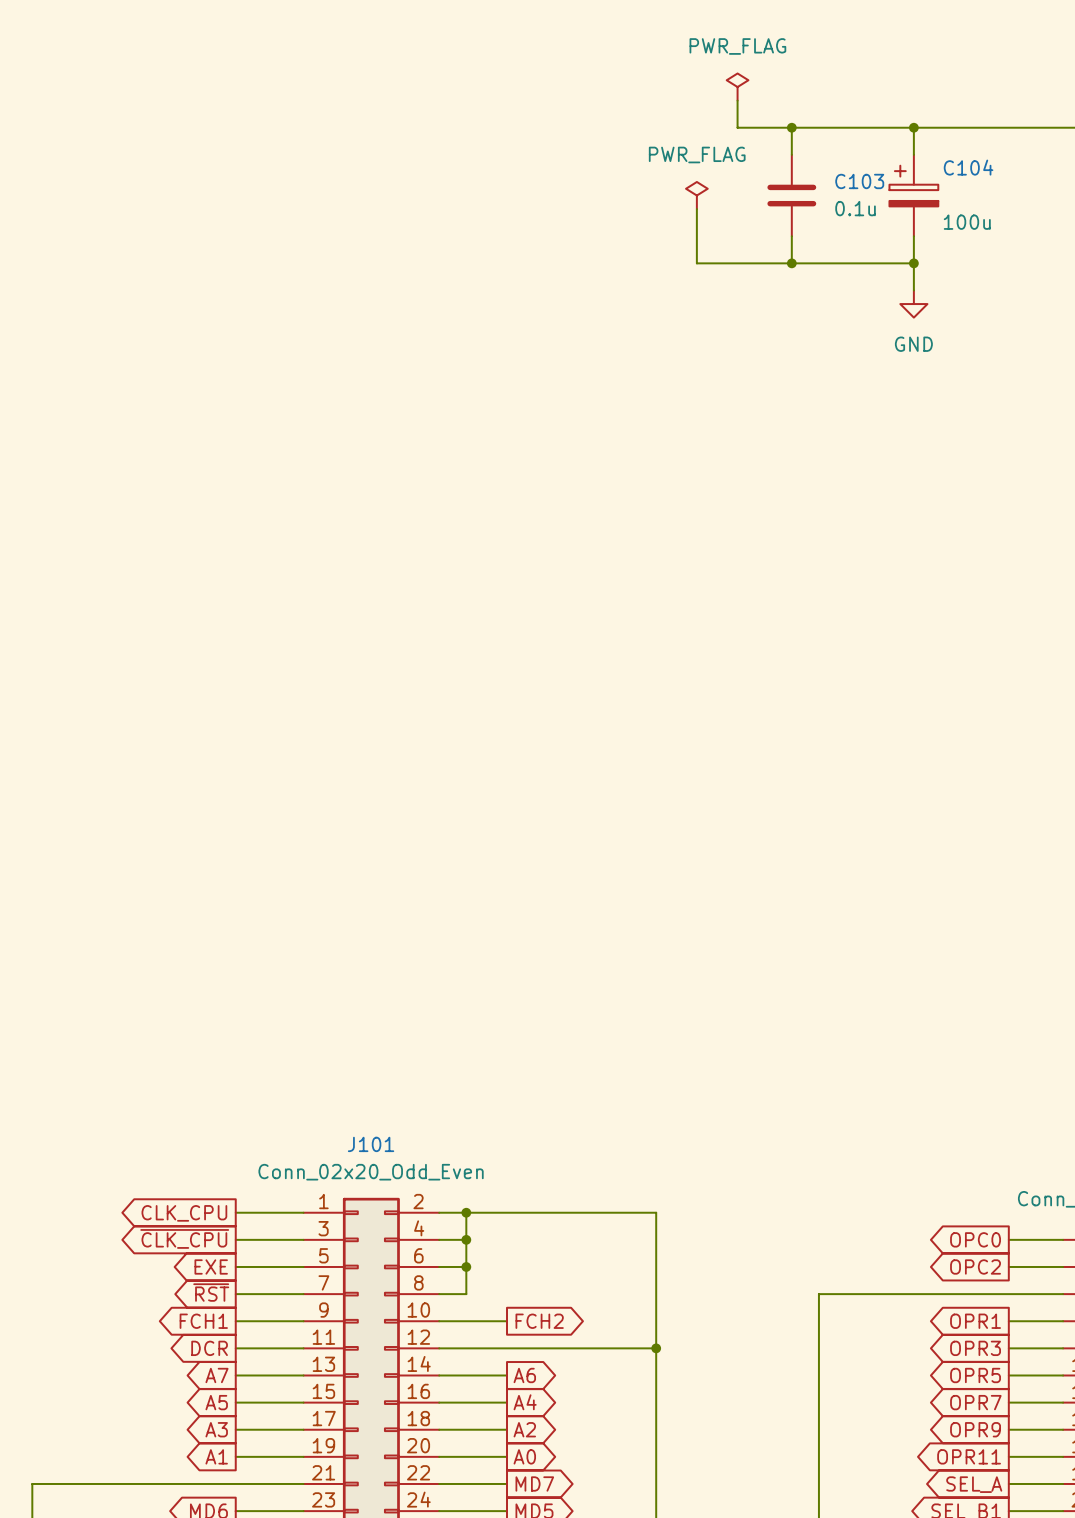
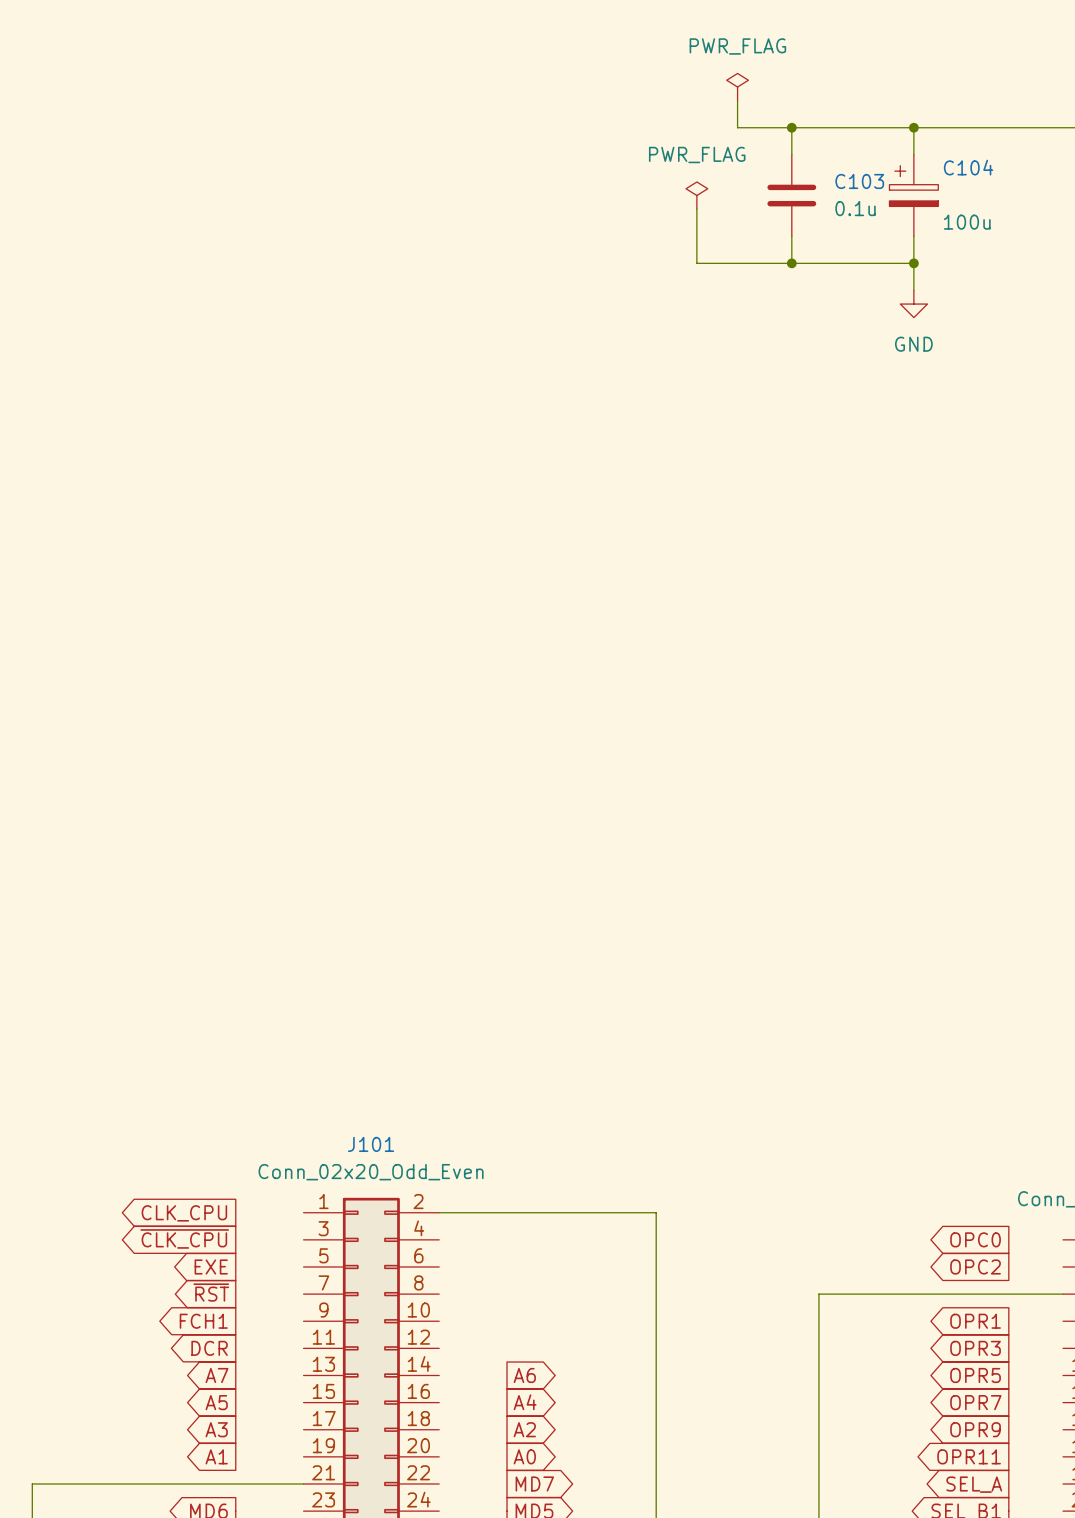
wire: (235, 1212) (303, 1212) -> none
wire: (466, 1212) (466, 1294) (439, 1294) -> none
junction: (466, 1212) -> none
wire: (235, 1239) (303, 1239) -> none
wire: (439, 1239) (466, 1239) -> none
junction: (466, 1239) -> none
wire: (1008, 1239) (1063, 1239) -> none
wire: (235, 1266) (303, 1266) -> none
wire: (439, 1266) (466, 1266) -> none
junction: (466, 1266) -> none
wire: (1008, 1266) (1063, 1266) -> none
wire: (235, 1294) (303, 1294) -> none
wire: (235, 1321) (303, 1321) -> none
wire: (439, 1321) (507, 1321) -> none
global label: FCH2 (539, 1321) -> none
wire: (1008, 1321) (1063, 1321) -> none
wire: (235, 1348) (303, 1348) -> none
wire: (439, 1348) (656, 1348) -> none
junction: (656, 1348) -> none
wire: (1008, 1348) (1063, 1348) -> none
wire: (235, 1375) (303, 1375) -> none
wire: (439, 1375) (507, 1375) -> none
wire: (1008, 1375) (1063, 1375) -> none
wire: (235, 1402) (303, 1402) -> none
wire: (439, 1402) (507, 1402) -> none
wire: (1008, 1402) (1063, 1402) -> none
wire: (235, 1429) (303, 1429) -> none
wire: (439, 1429) (507, 1429) -> none
wire: (1008, 1429) (1063, 1429) -> none
wire: (235, 1456) (303, 1456) -> none
wire: (439, 1456) (507, 1456) -> none
wire: (1008, 1456) (1063, 1456) -> none
wire: (439, 1483) (507, 1483) -> none
wire: (1008, 1483) (1063, 1483) -> none
wire: (235, 1511) (303, 1511) -> none
wire: (439, 1511) (507, 1511) -> none
wire: (1008, 1511) (1063, 1511) -> none

